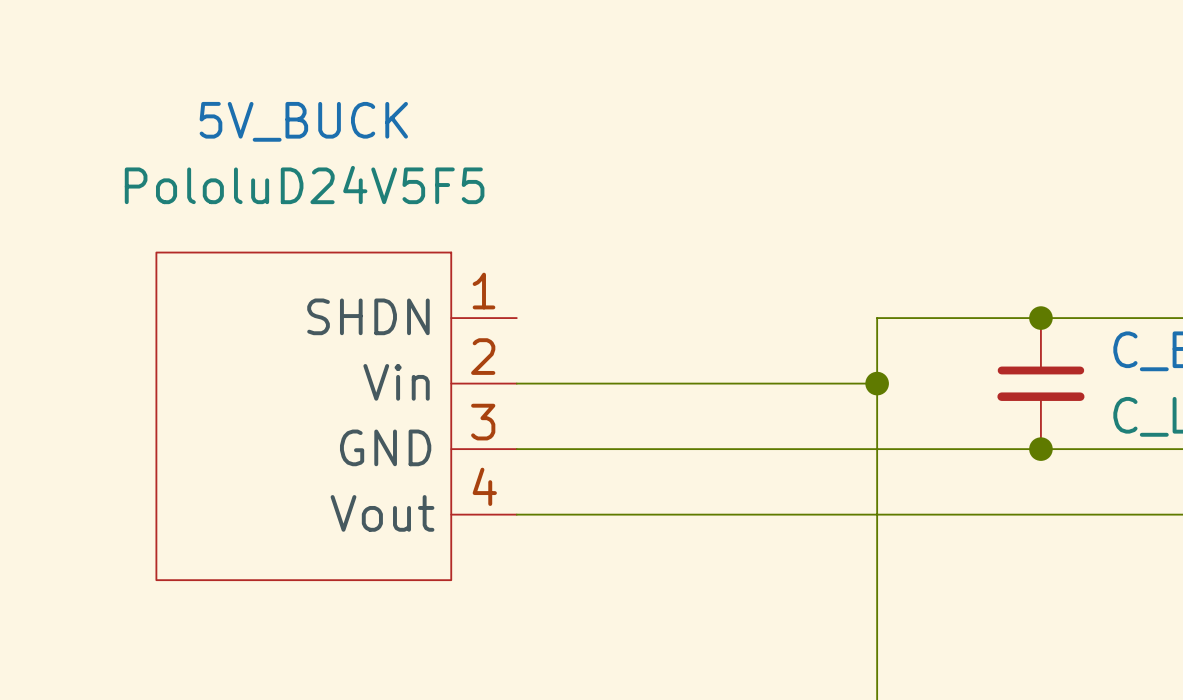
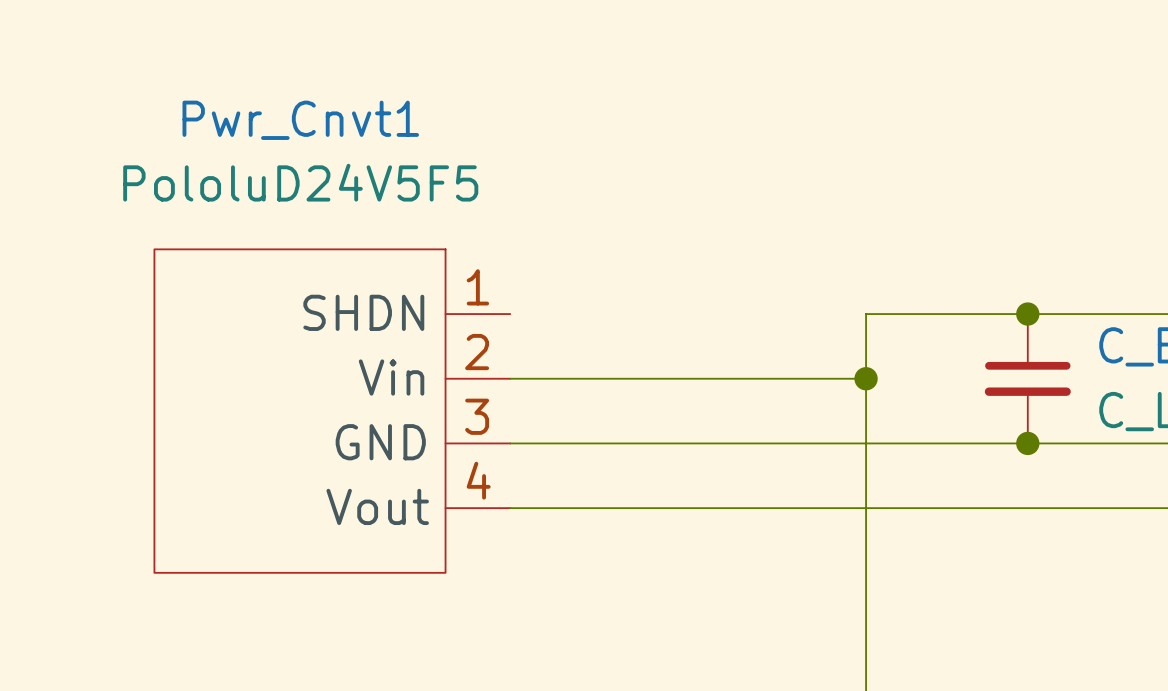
5V_BUCK name: 5V_BUCK (303, 121) -> Pwr_Cnvt1 (300, 120)

